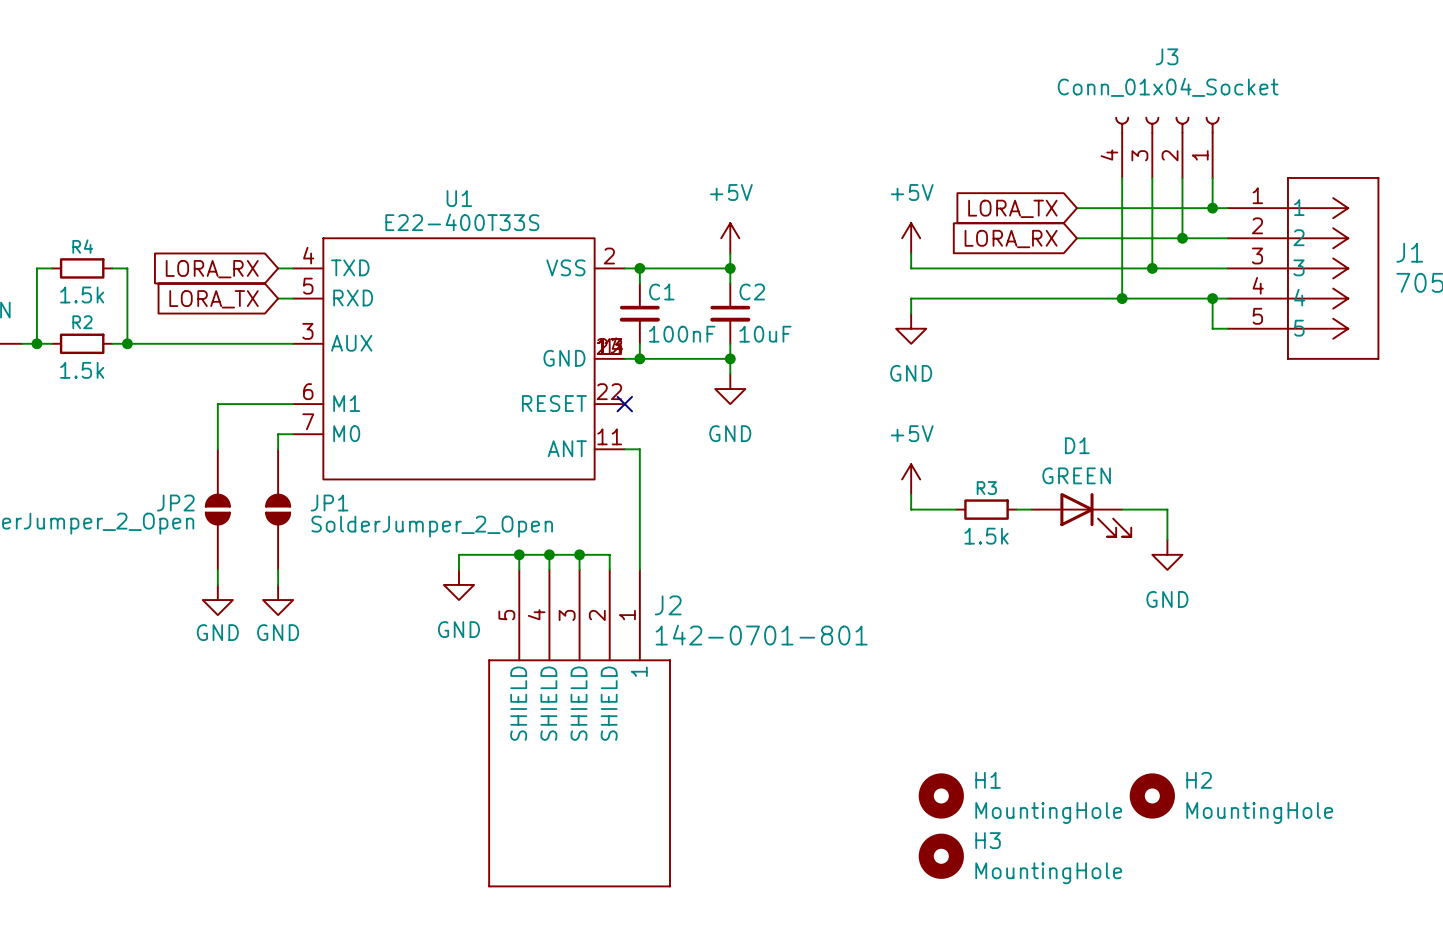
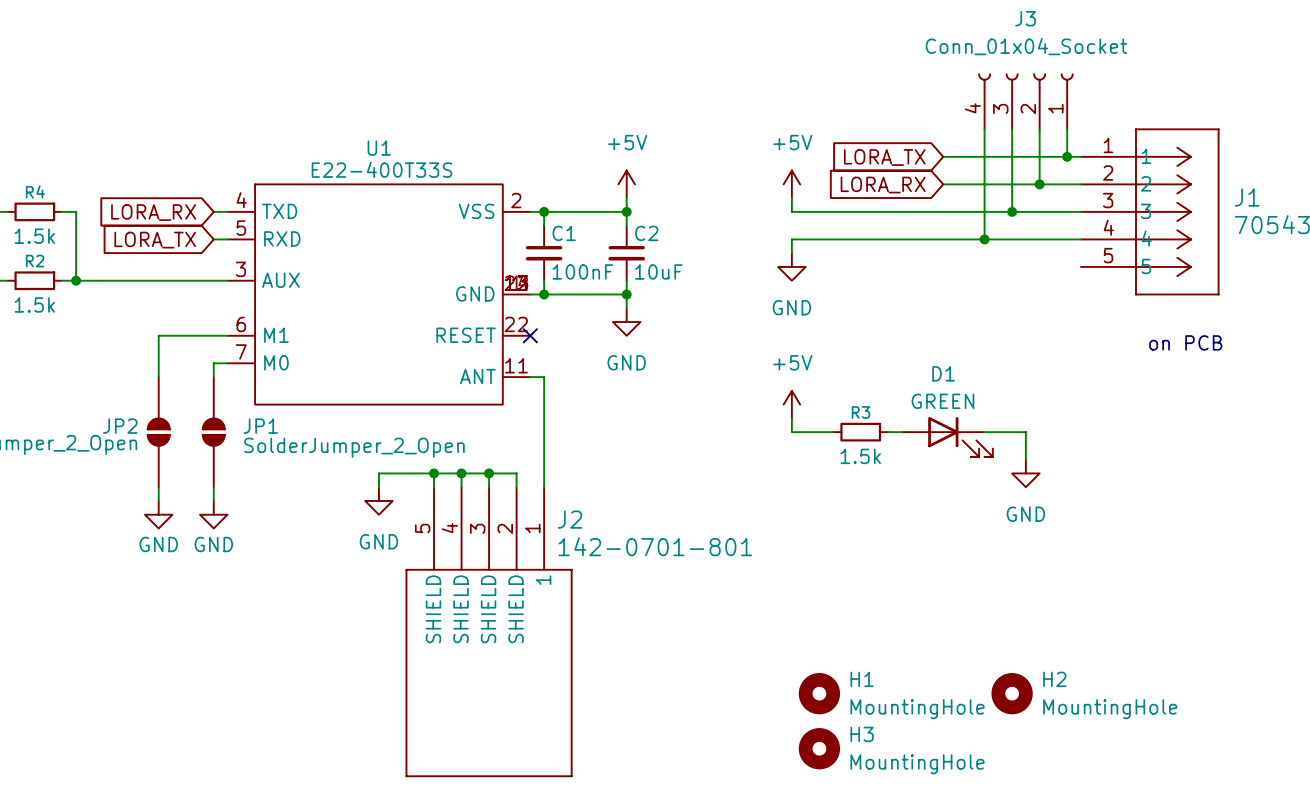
wire: (1212, 298) (1212, 328) (1227, 328) -> none
junction: (1212, 298) -> none
text: none -> on PCB (1185, 342)

